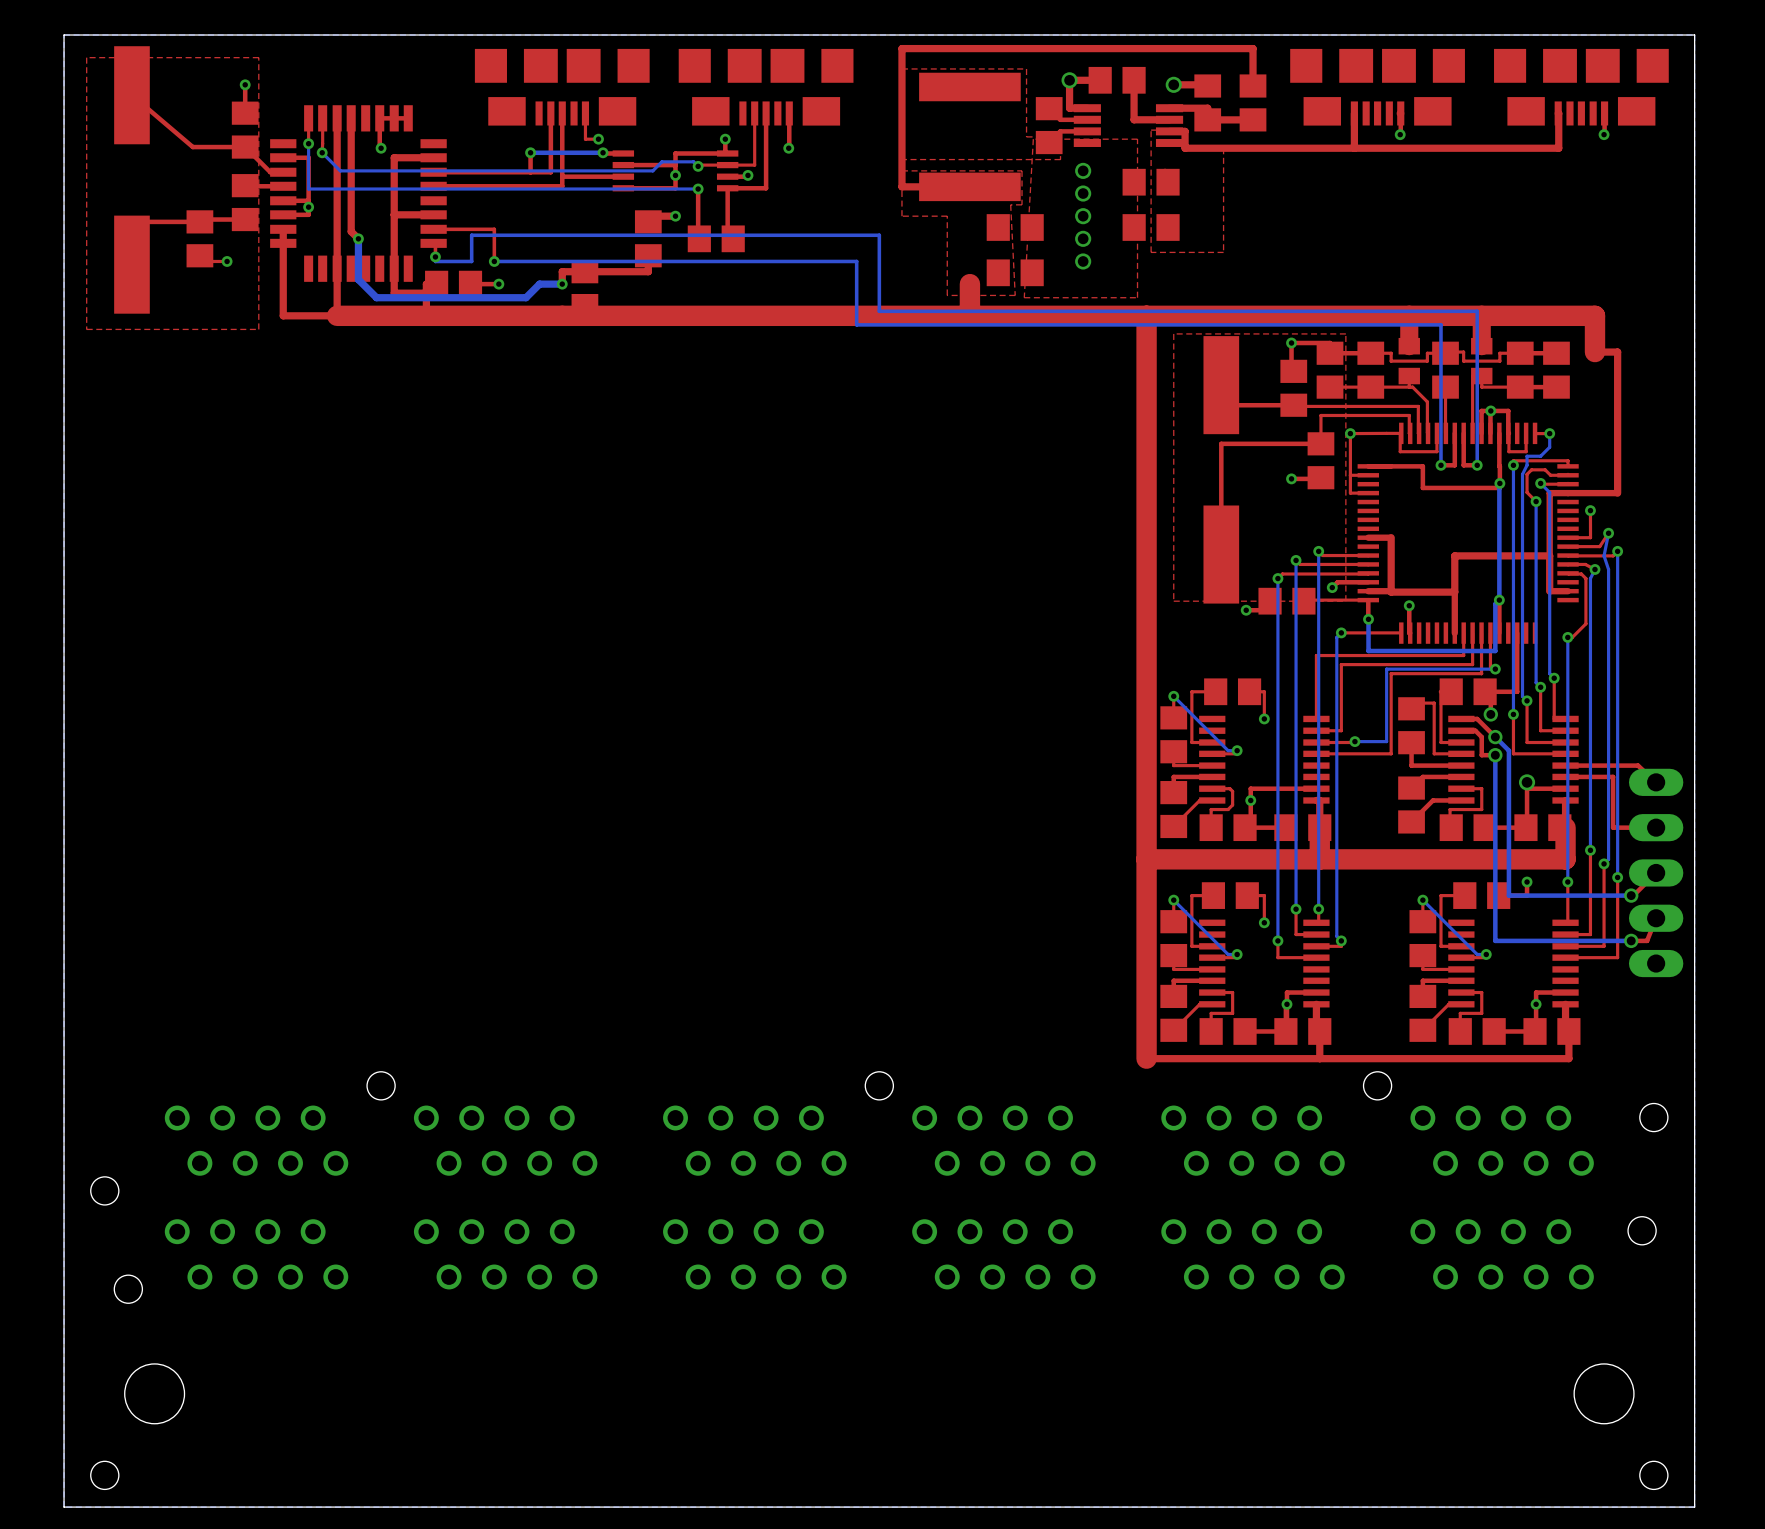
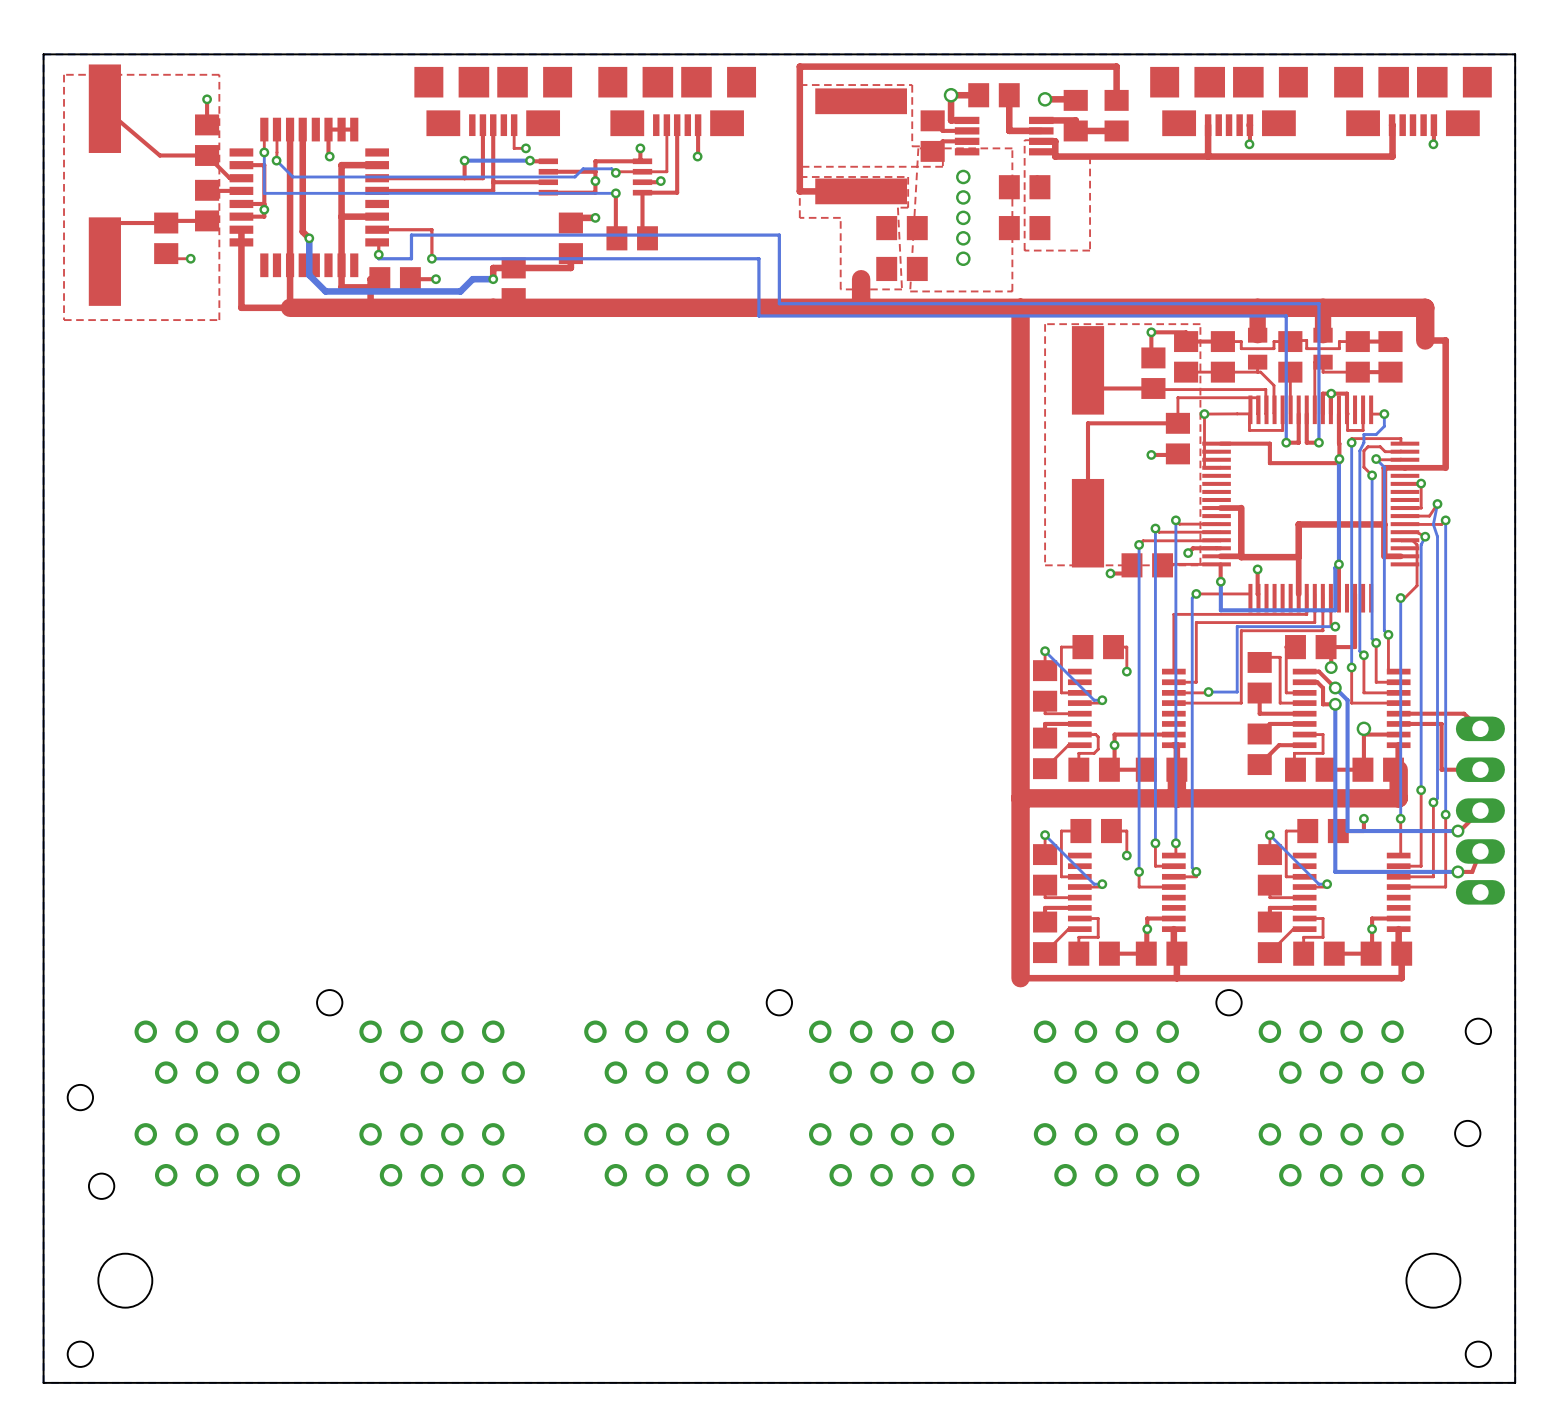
part footprint: [1357, 422, 1579, 644] -> [1202, 395, 1420, 613]

